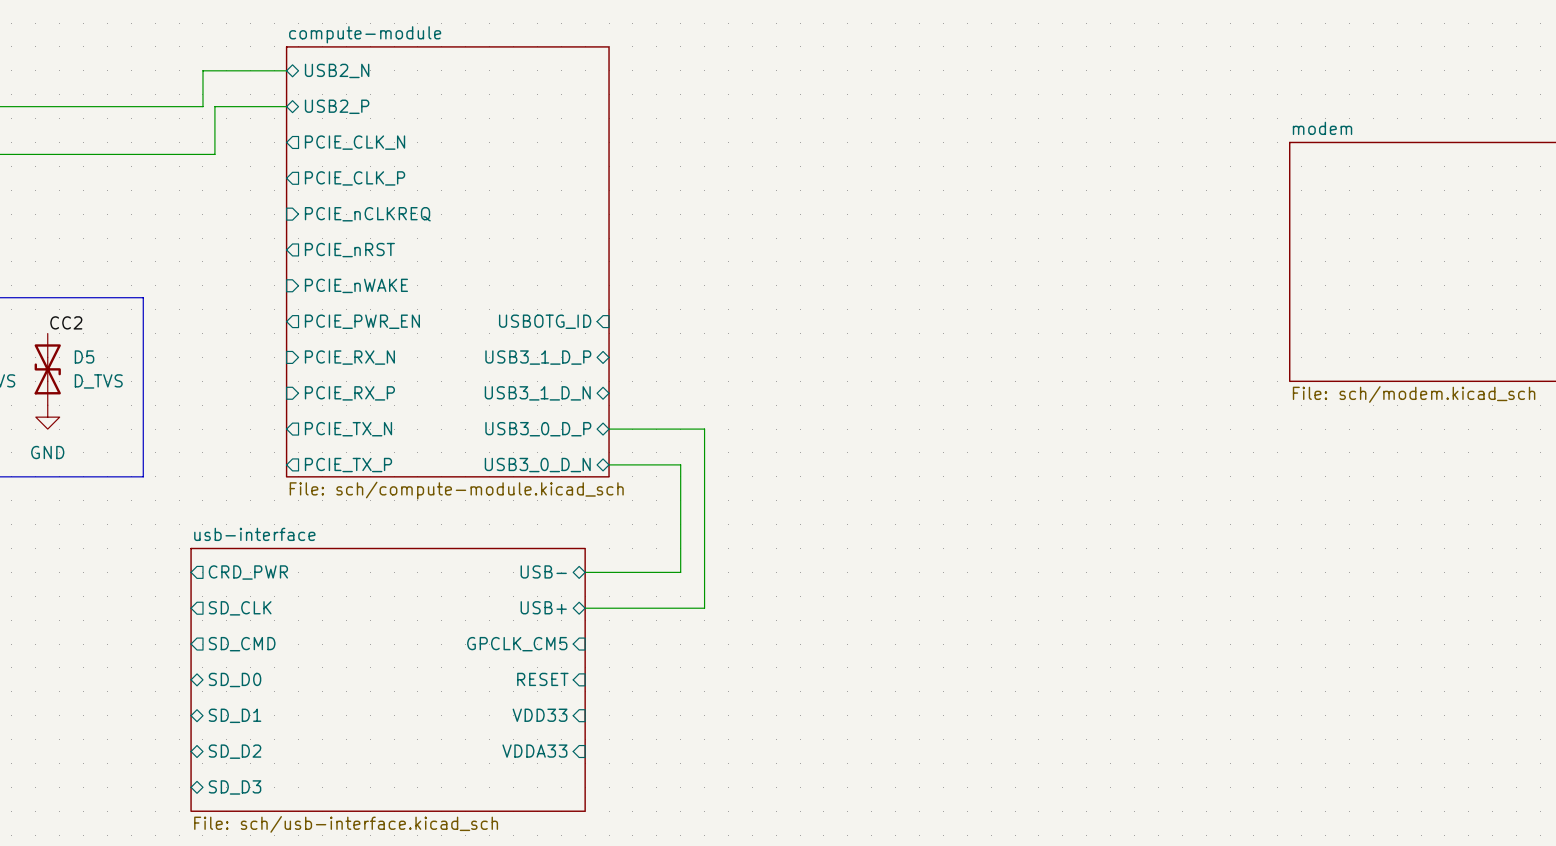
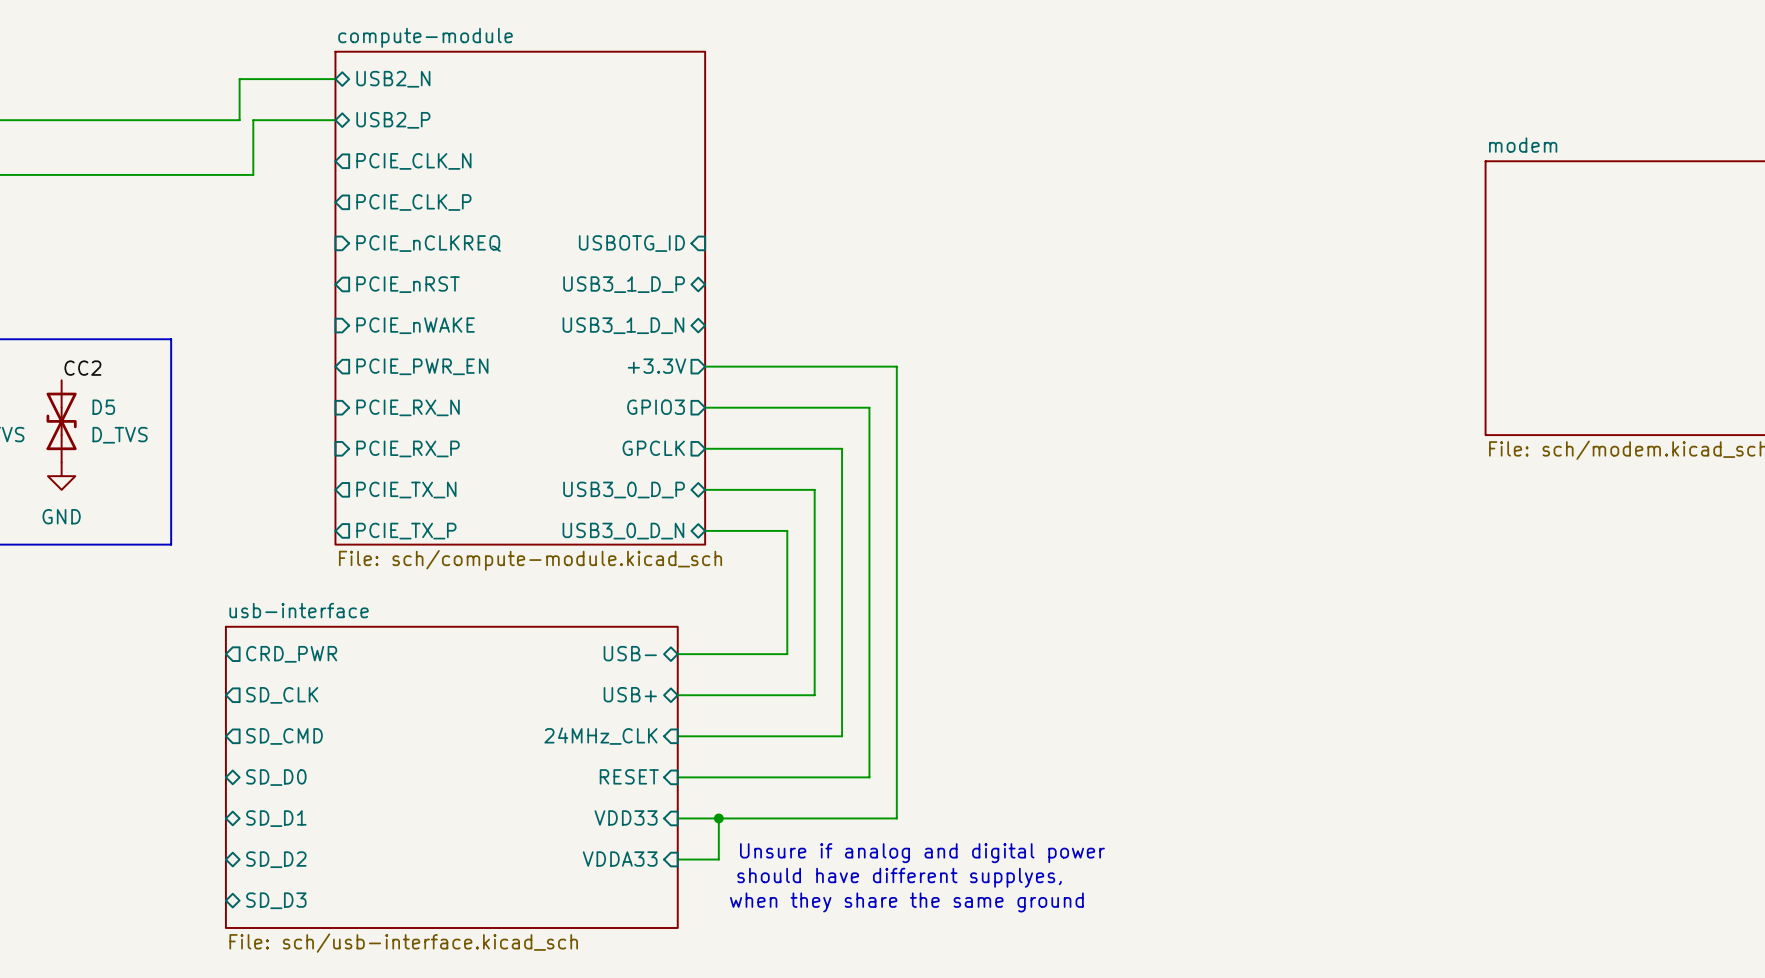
sheet pin: none -> USBOTG_ID (631, 243)
sheet pin: none -> USB3_1_D_P (624, 284)
sheet pin: none -> USB3_1_D_N (623, 325)
sheet pin shape: input (545, 321) -> output (657, 366)
sheet pin: USBOTG_ID (545, 321) -> +3.3V (657, 366)
wire: none -> (705, 366) (896, 366) (896, 818) (677, 818)
sheet pin shape: bidirectional (538, 357) -> output (656, 407)
sheet pin: USB3_1_D_P (538, 357) -> GPIO3 (656, 407)
wire: none -> (705, 407) (869, 407) (869, 777) (677, 777)
sheet pin shape: bidirectional (537, 393) -> output (653, 448)
sheet pin: USB3_1_D_N (537, 393) -> GPCLK (653, 448)
wire: none -> (705, 448) (842, 448) (842, 736) (677, 736)
sheet pin: GPCLK_CM5 (517, 644) -> 24MHz_CLK (600, 736)
wire: none -> (718, 818) (718, 859) (677, 859)
junction: none -> (718, 818)
text: none -> Unsure if analog and digital power (922, 853)
text: none -> should have different supplyes, (899, 877)
text: none -> when they share the same ground (906, 902)

